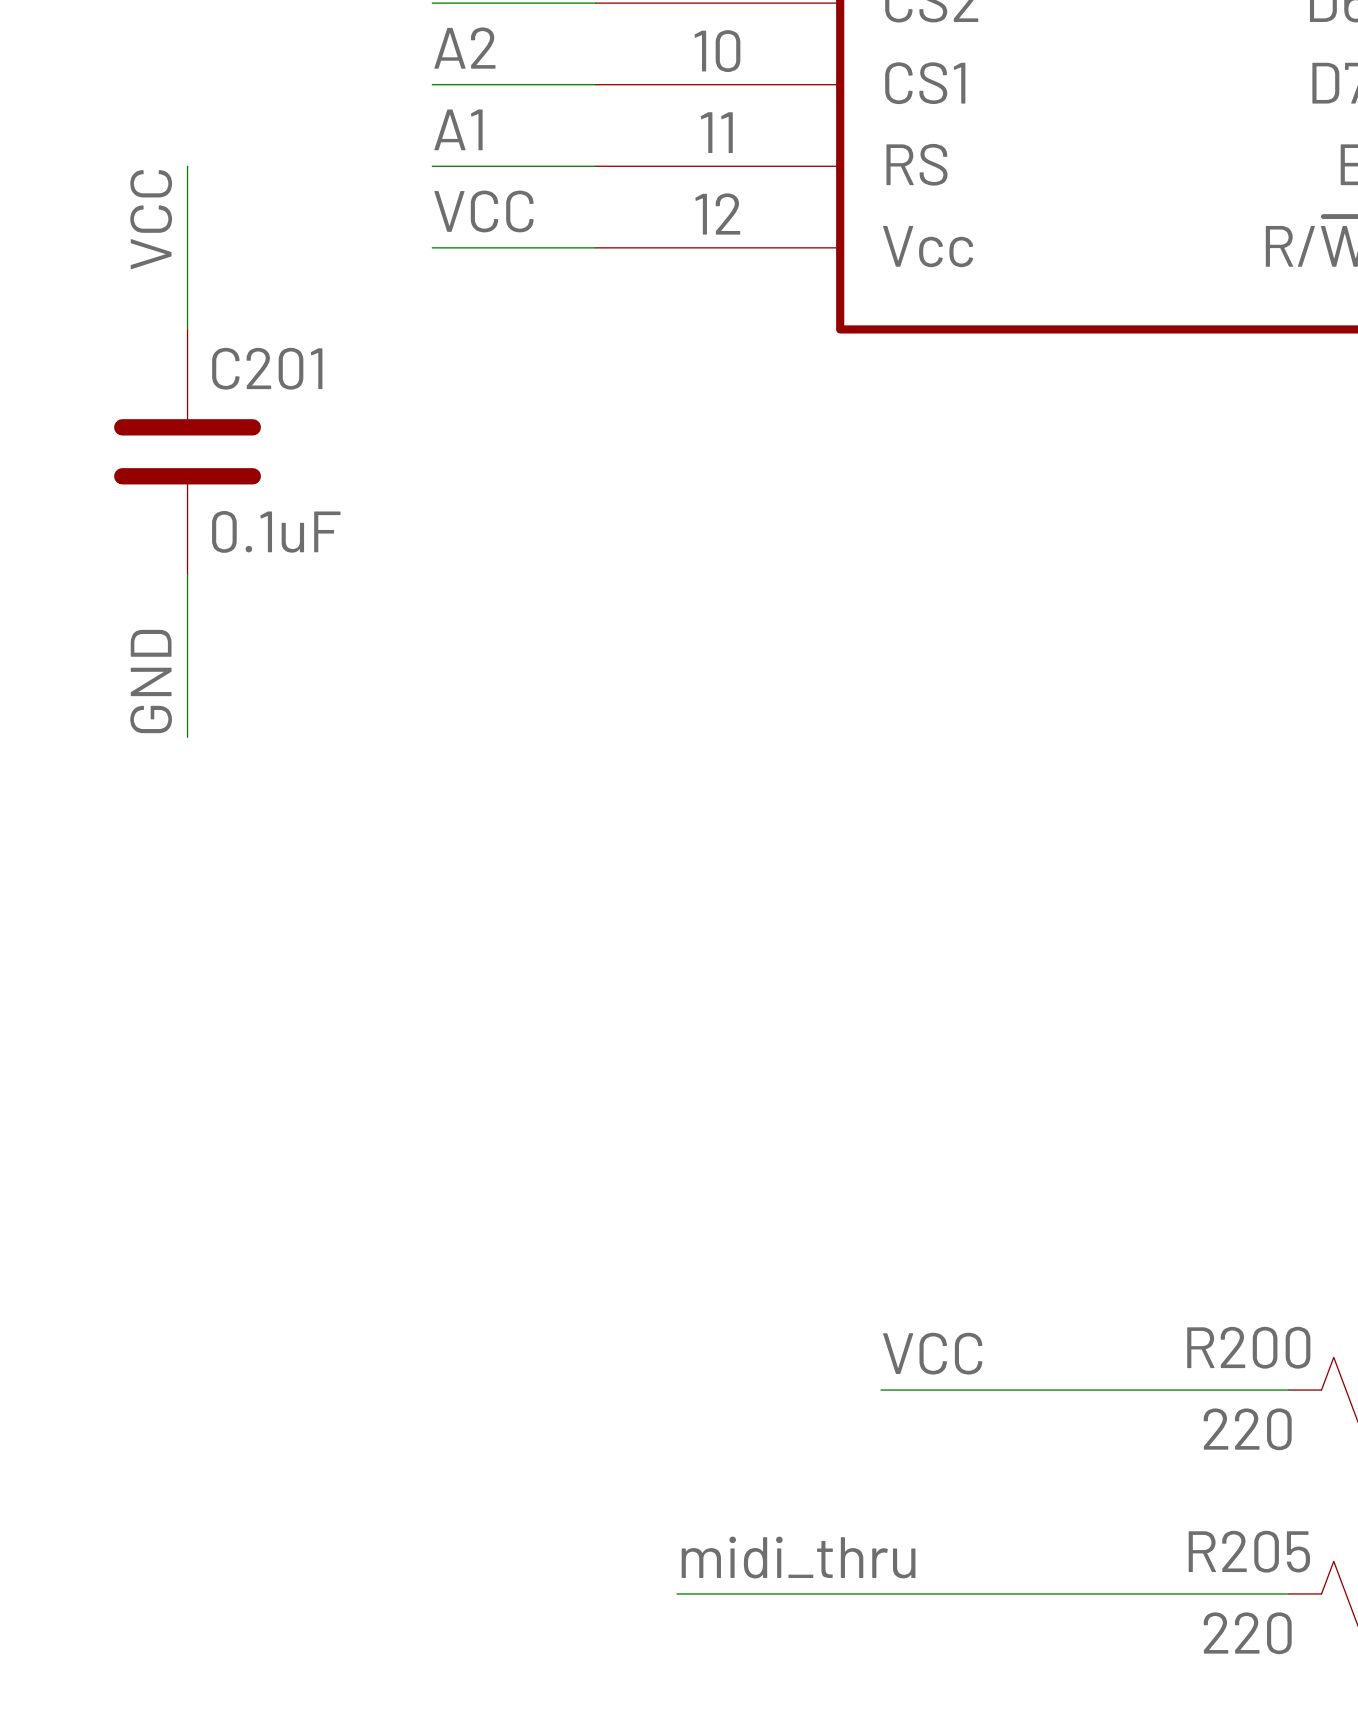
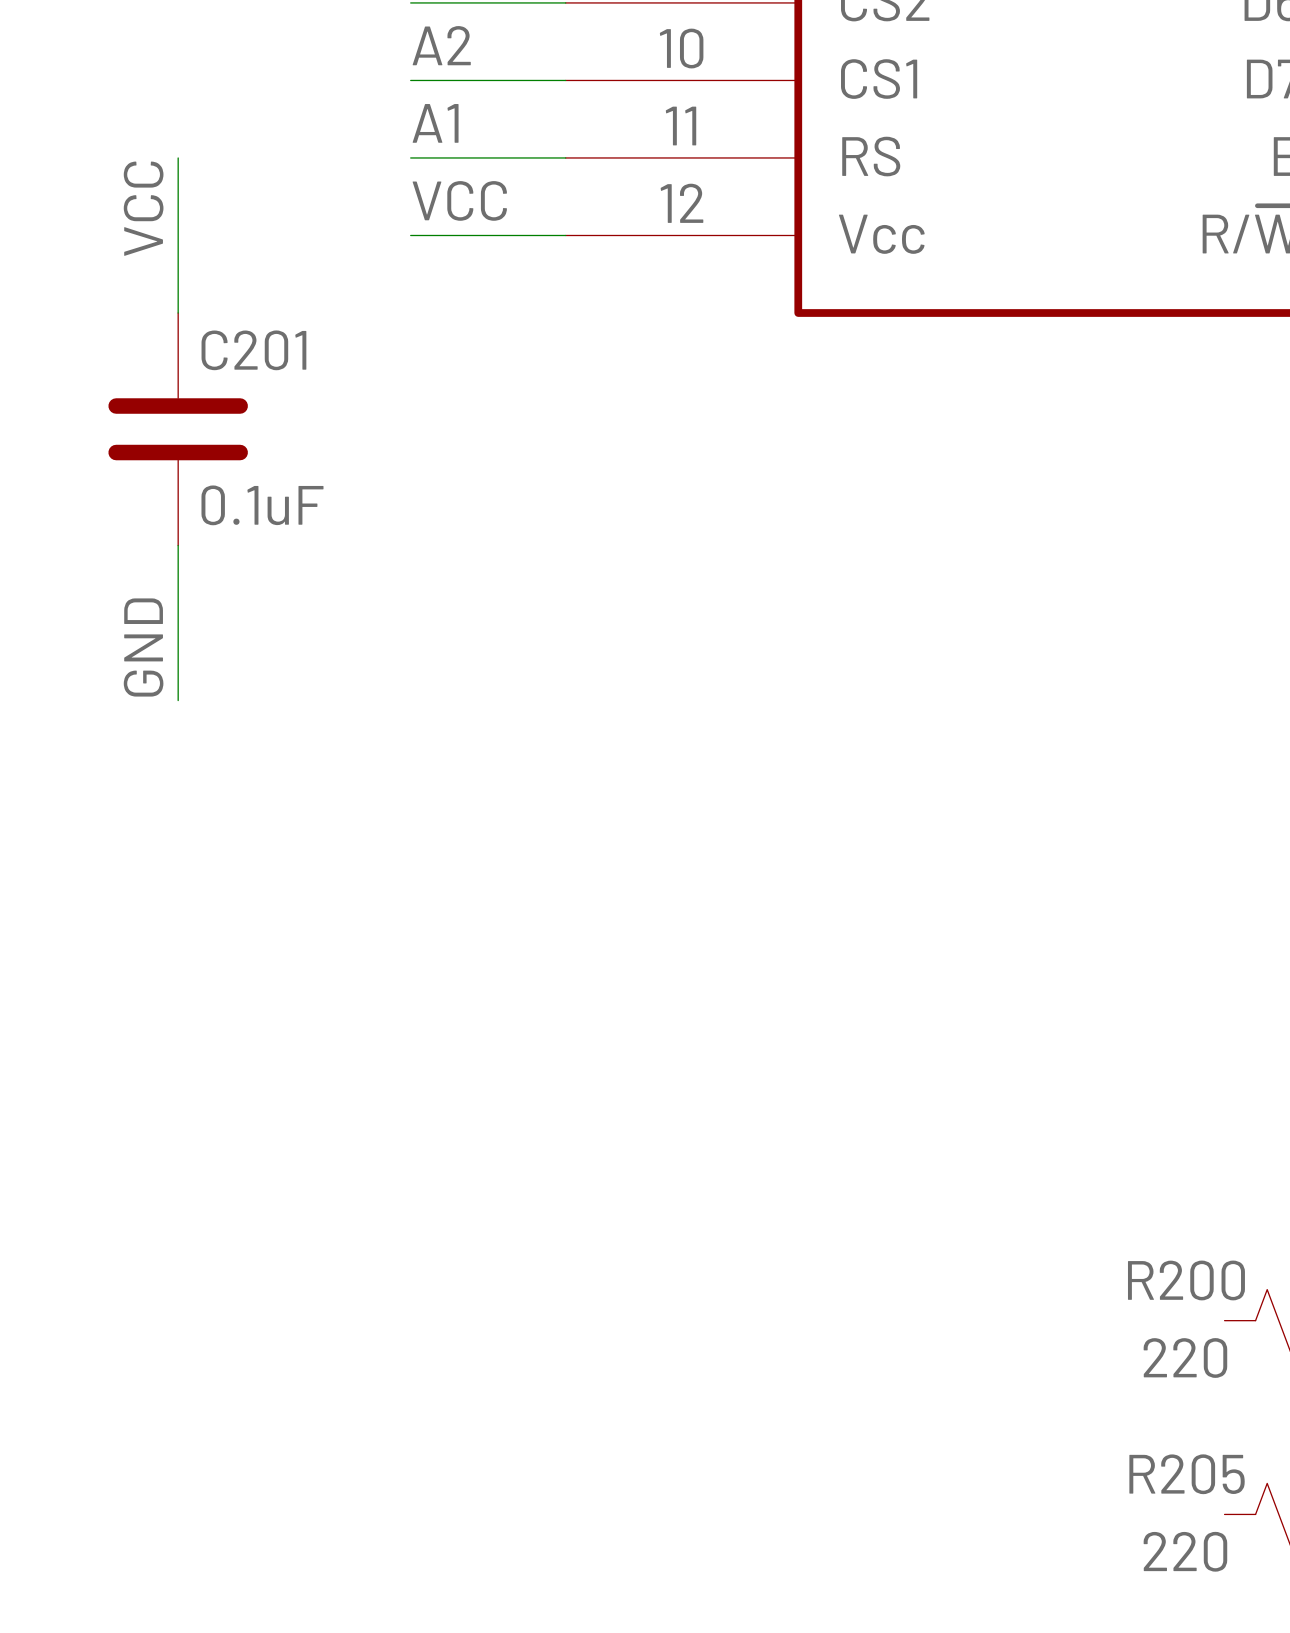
label: VCC (932, 1353) -> none
wire: (880, 1390) (1288, 1390) -> none
label: midi_thru (798, 1557) -> none
wire: (677, 1593) (1288, 1593) -> none

